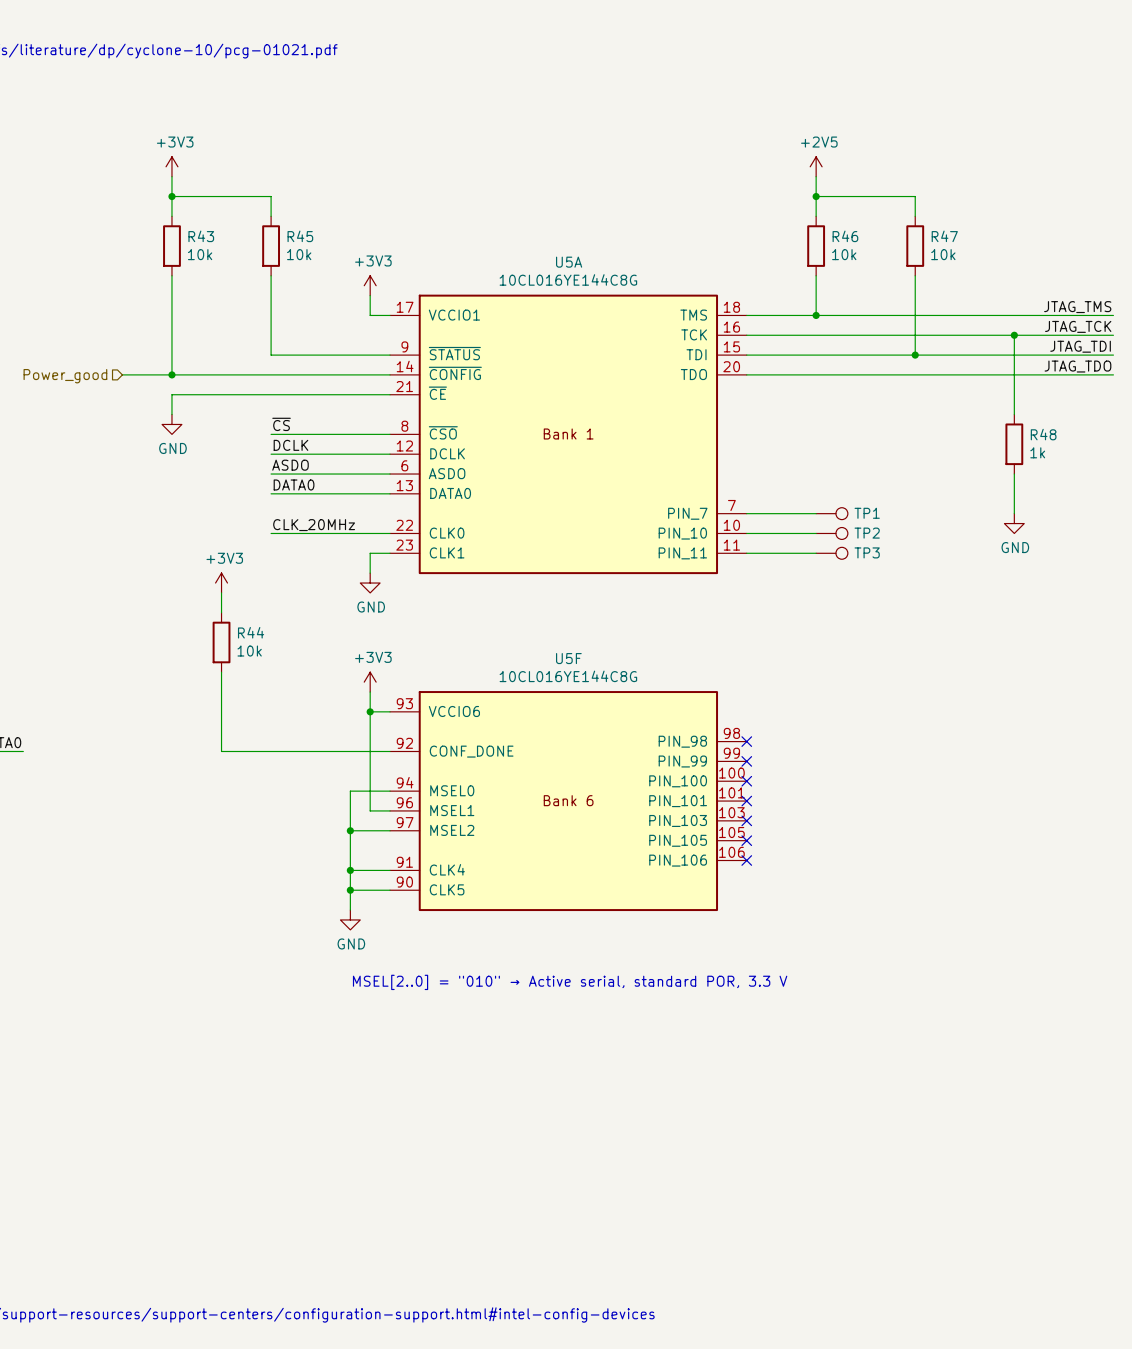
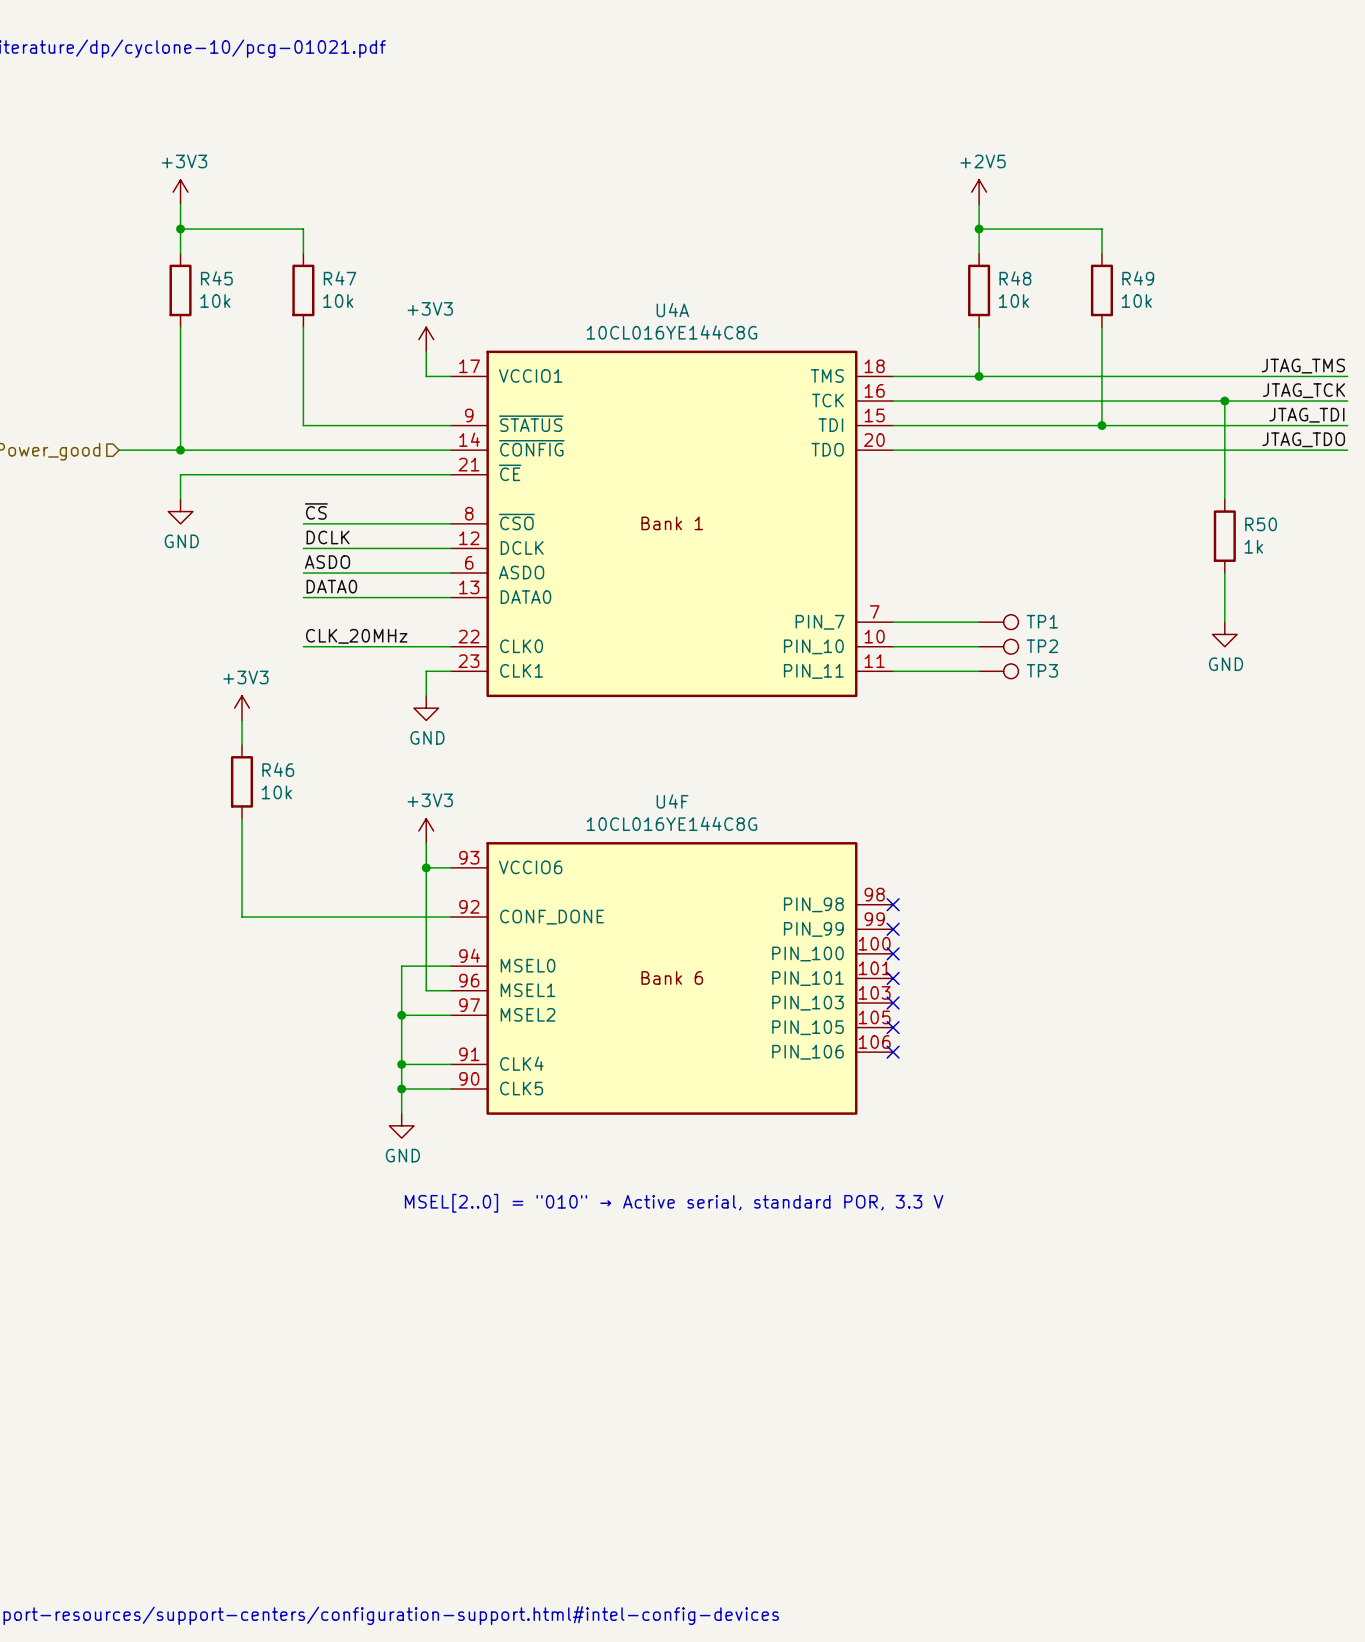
R43 name: R43 (201, 236) -> R45 (216, 278)
R45 name: R45 (300, 236) -> R47 (340, 278)
R46 name: R46 (845, 236) -> R48 (1015, 278)
R47 name: R47 (944, 236) -> R49 (1138, 278)
U5A name: U5A (569, 262) -> U4A (672, 310)
R48 name: R48 (1043, 434) -> R50 (1261, 524)
R44 name: R44 (251, 632) -> R46 (278, 769)
U5F name: U5F (568, 658) -> U4F (672, 801)

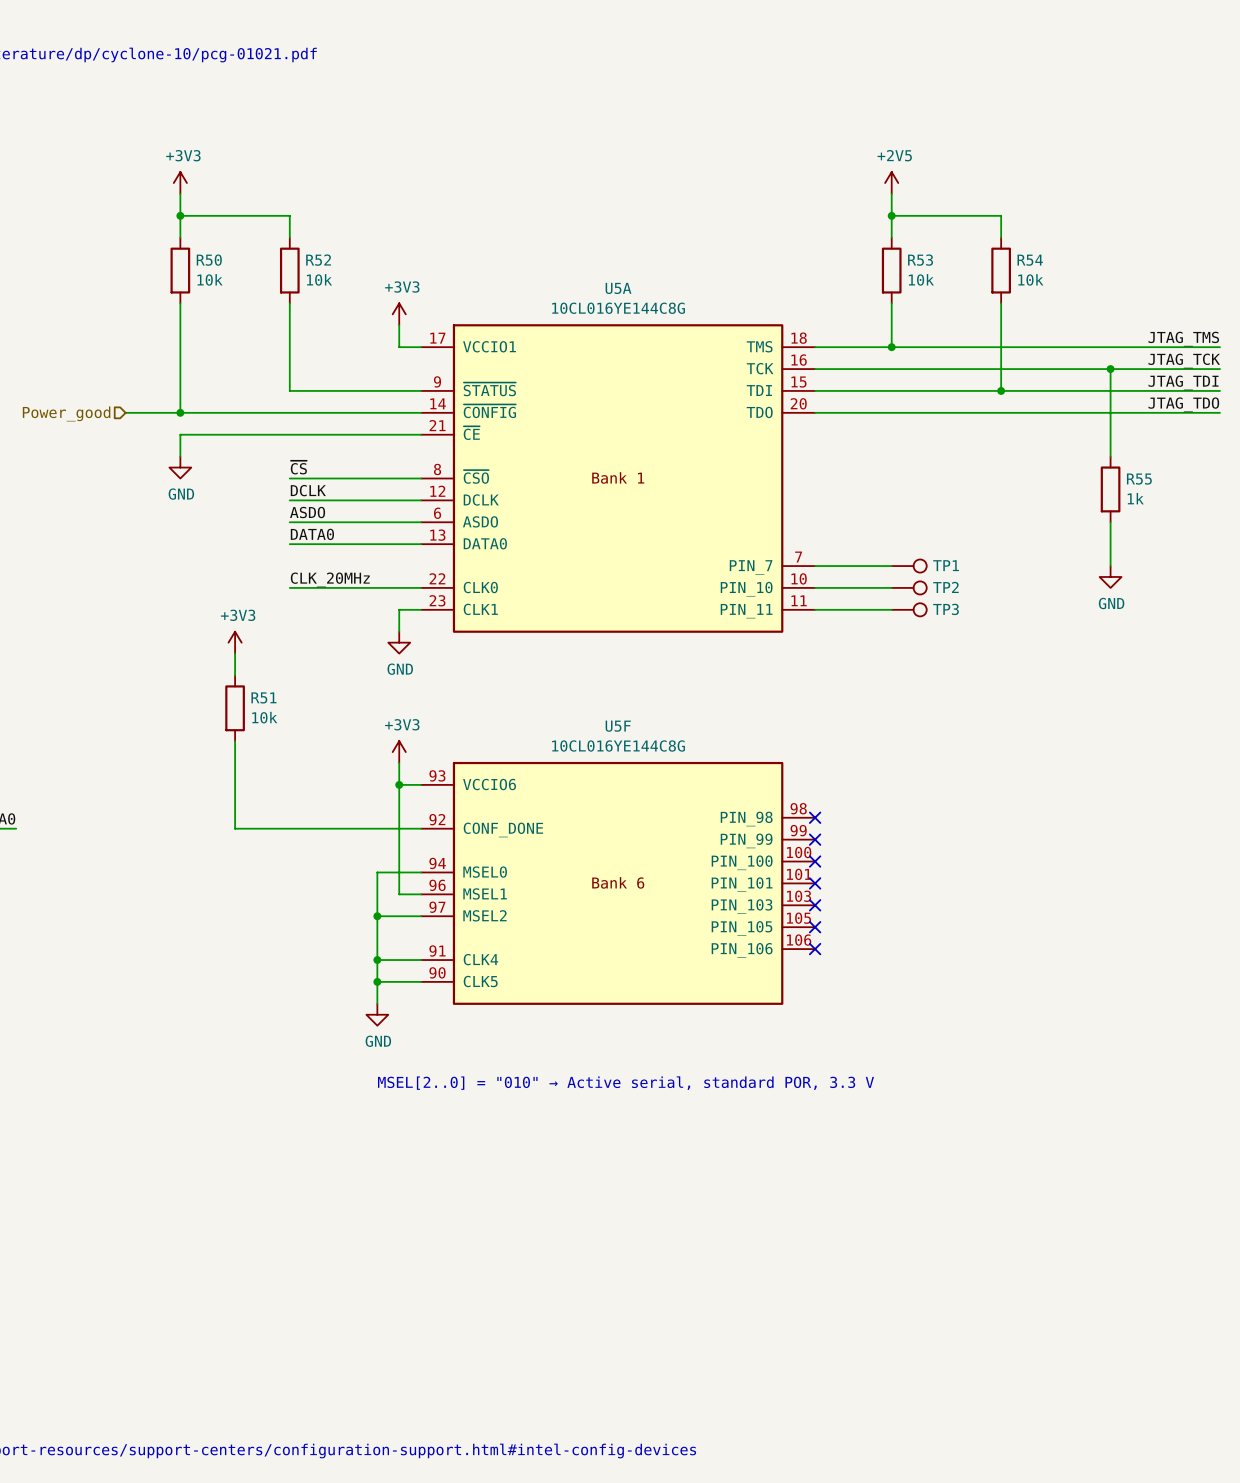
R45 name: R45 (216, 278) -> R50 (209, 260)
R47 name: R47 (340, 278) -> R52 (318, 260)
R48 name: R48 (1015, 278) -> R53 (920, 260)
R49 name: R49 (1138, 278) -> R54 (1030, 260)
U4A name: U4A (672, 310) -> U5A (618, 288)
R50 name: R50 (1261, 524) -> R55 (1139, 479)
R46 name: R46 (278, 769) -> R51 (263, 697)
U4F name: U4F (672, 801) -> U5F (618, 726)

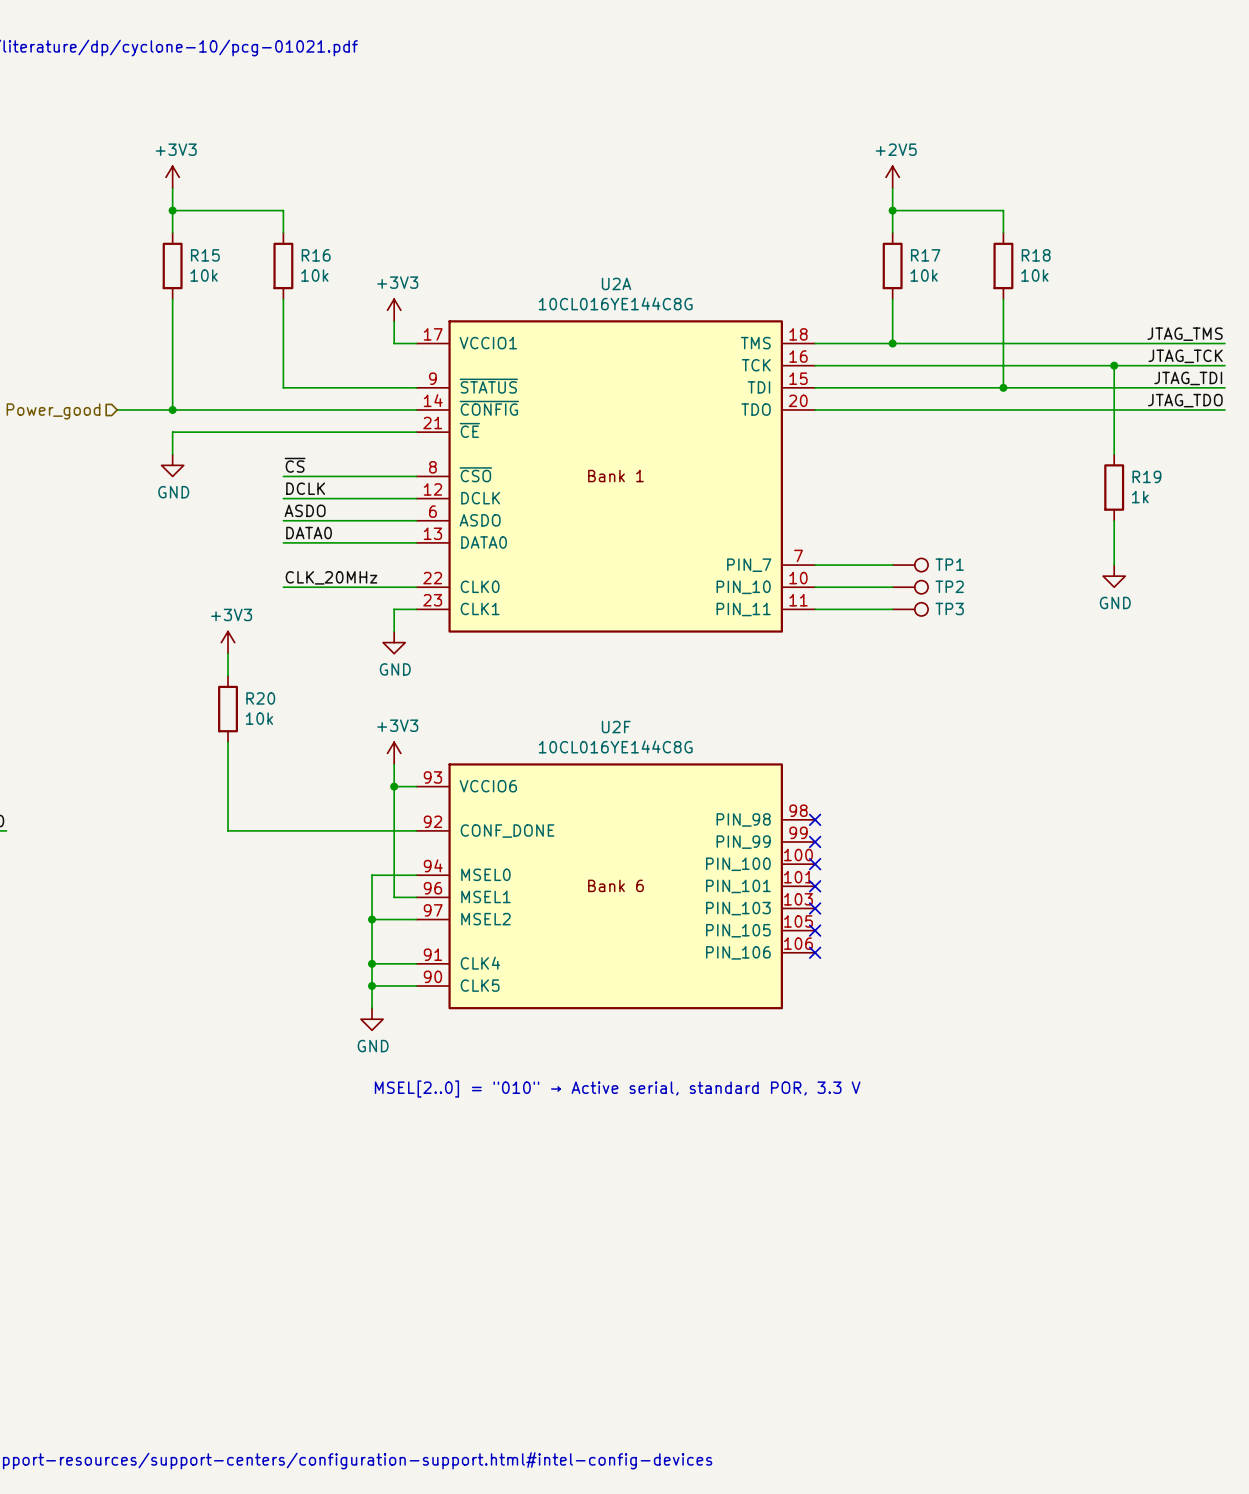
R50 name: R50 (209, 260) -> R15 (205, 255)
R52 name: R52 (318, 260) -> R16 (316, 255)
R53 name: R53 (920, 260) -> R17 (925, 255)
R54 name: R54 (1030, 260) -> R18 (1036, 255)
U5A name: U5A (618, 288) -> U2A (616, 283)
R55 name: R55 (1139, 479) -> R19 (1146, 476)
R51 name: R51 (263, 697) -> R20 (260, 698)
U5F name: U5F (618, 726) -> U2F (616, 727)

